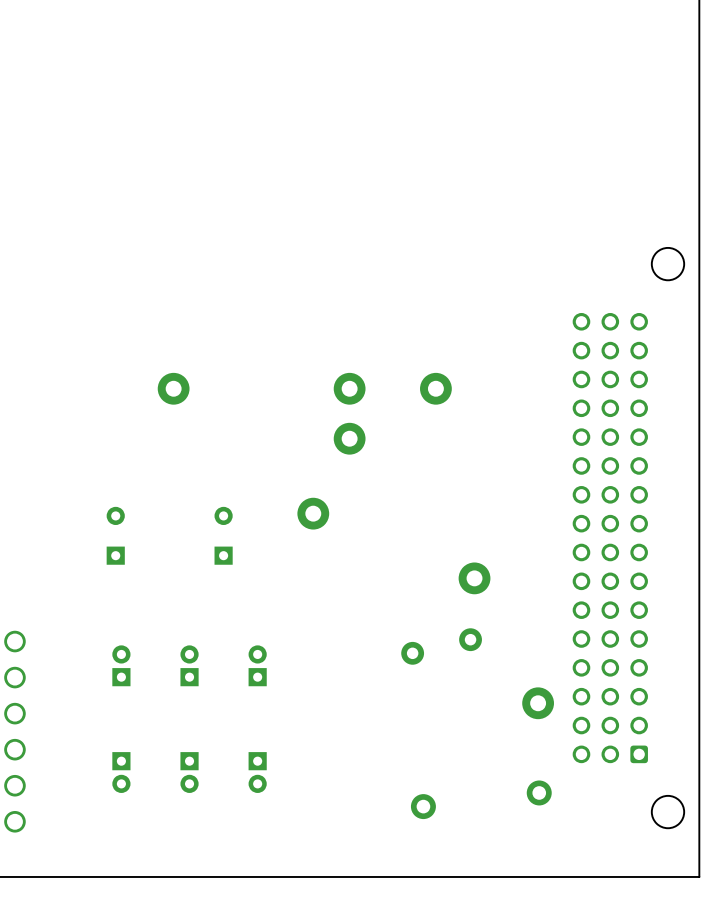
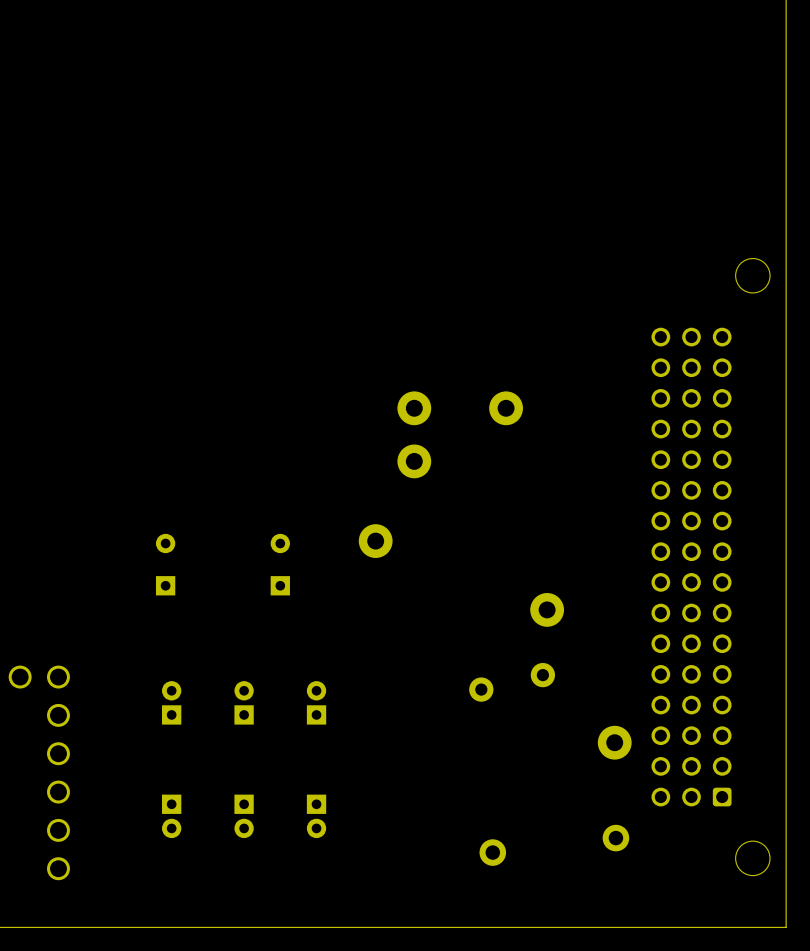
part: (173, 388) -> none

